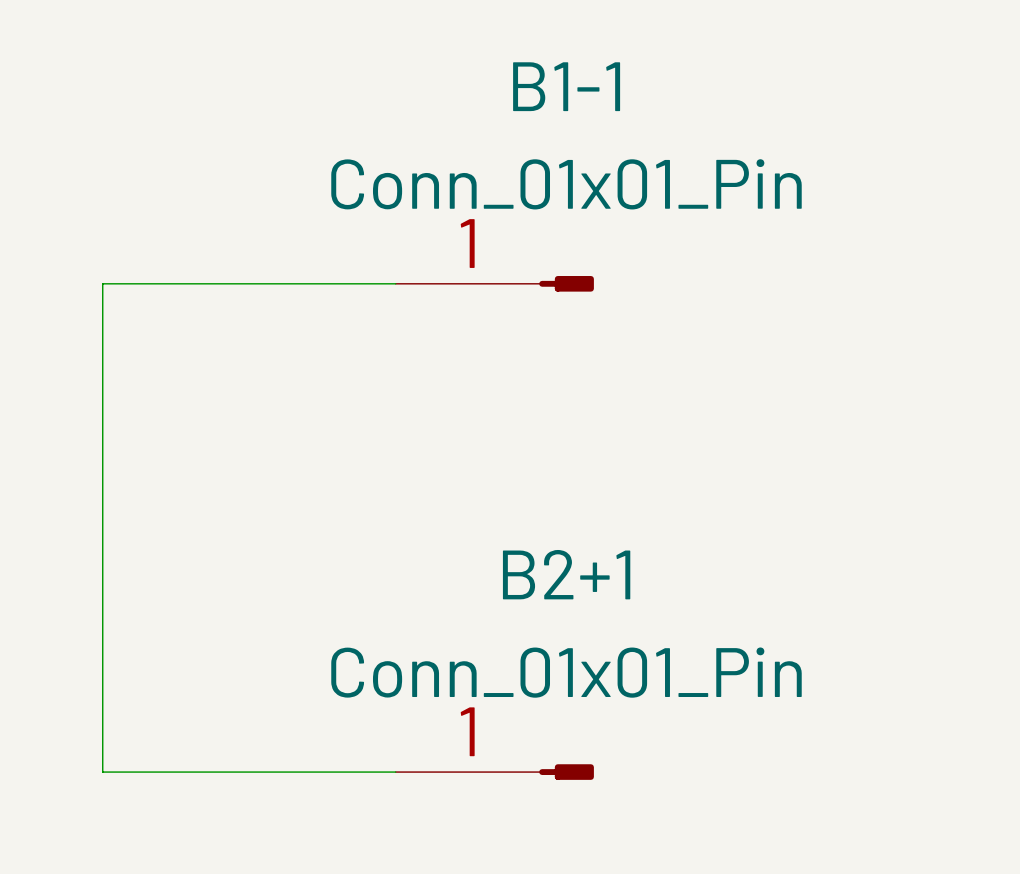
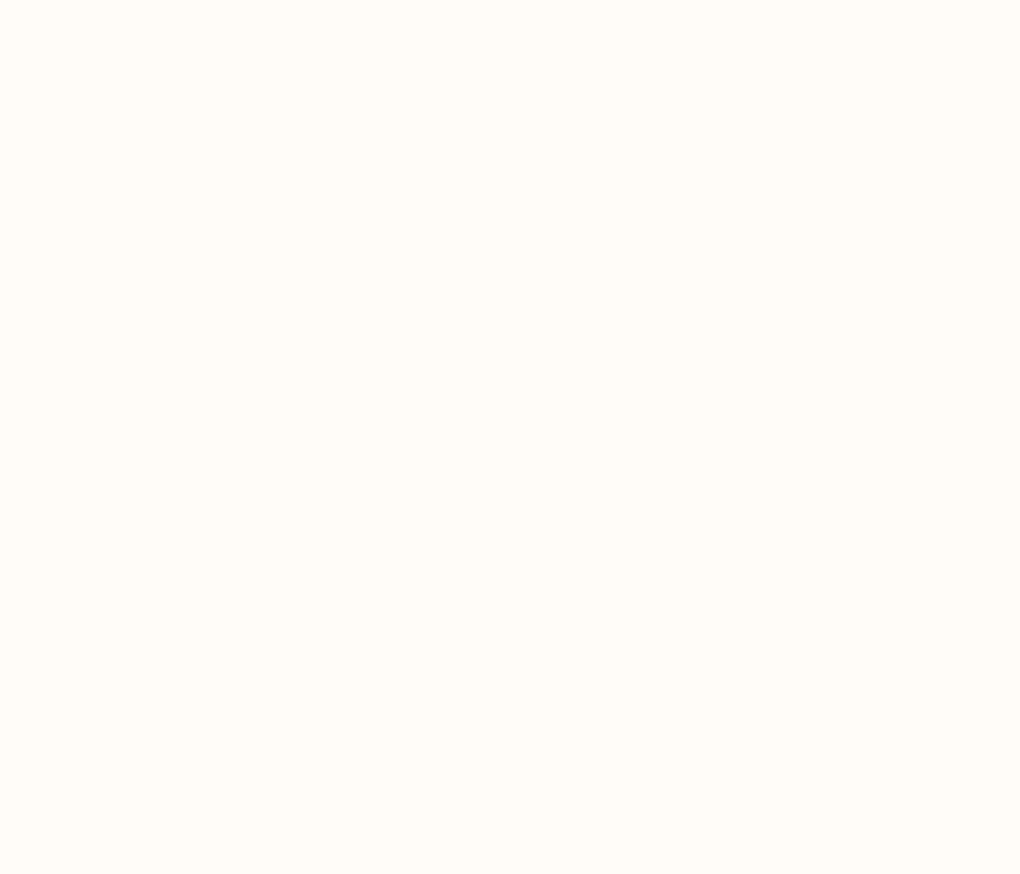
wire: (395, 283) (102, 283) (102, 772) (395, 772) -> none
B1-1: Conn_01x01_Pin (494, 283) -> none
B2+1: Conn_01x01_Pin (494, 772) -> none

